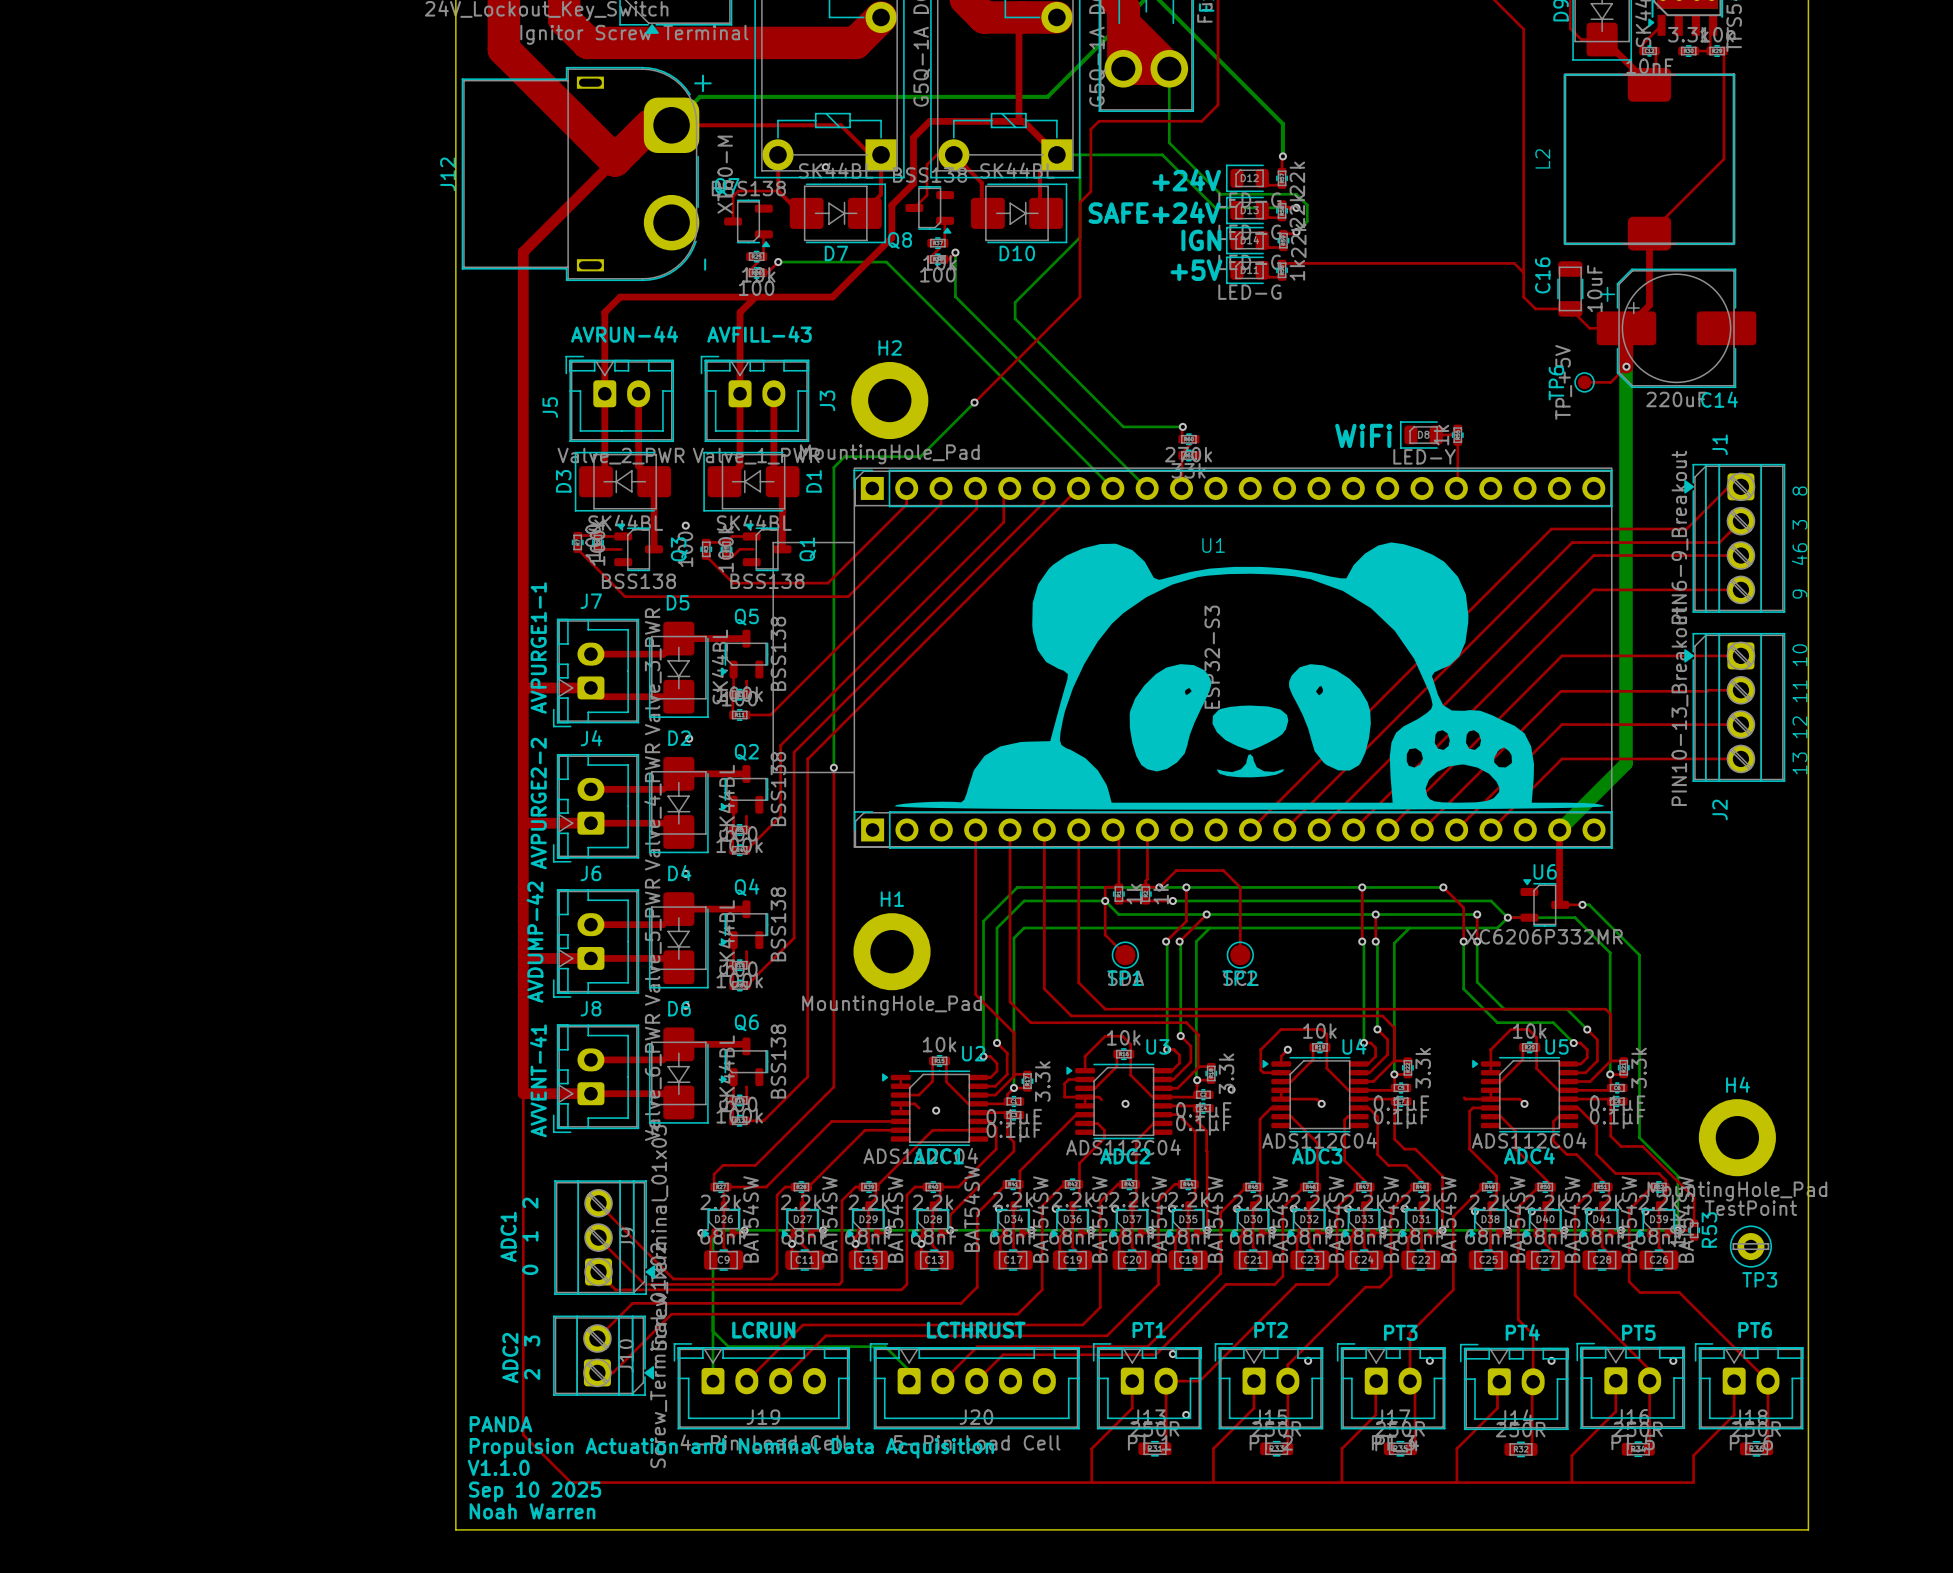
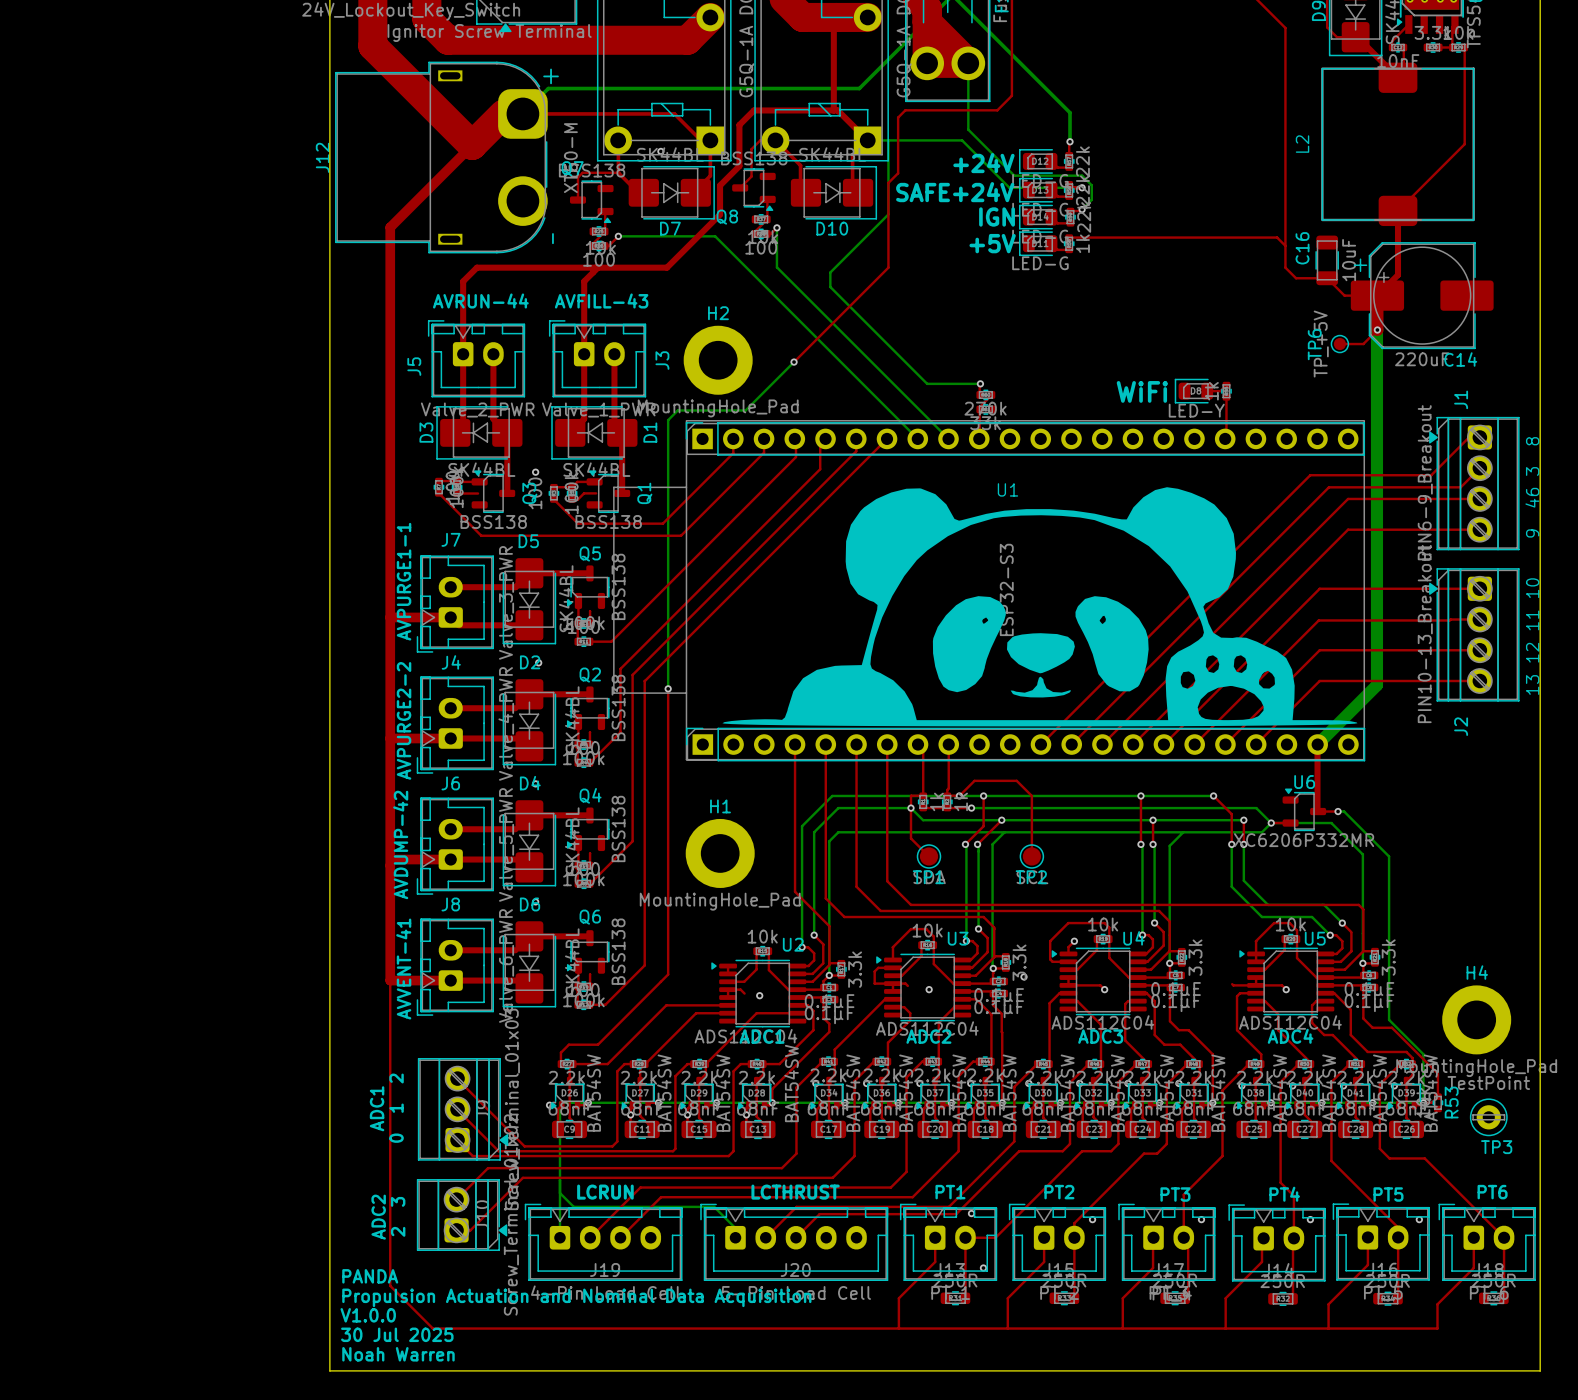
text: V1.1.0 (498, 1467) -> V1.0.0 (368, 1315)
text: Sep 10 2025 (535, 1491) -> 30 Jul 2025 (397, 1334)

